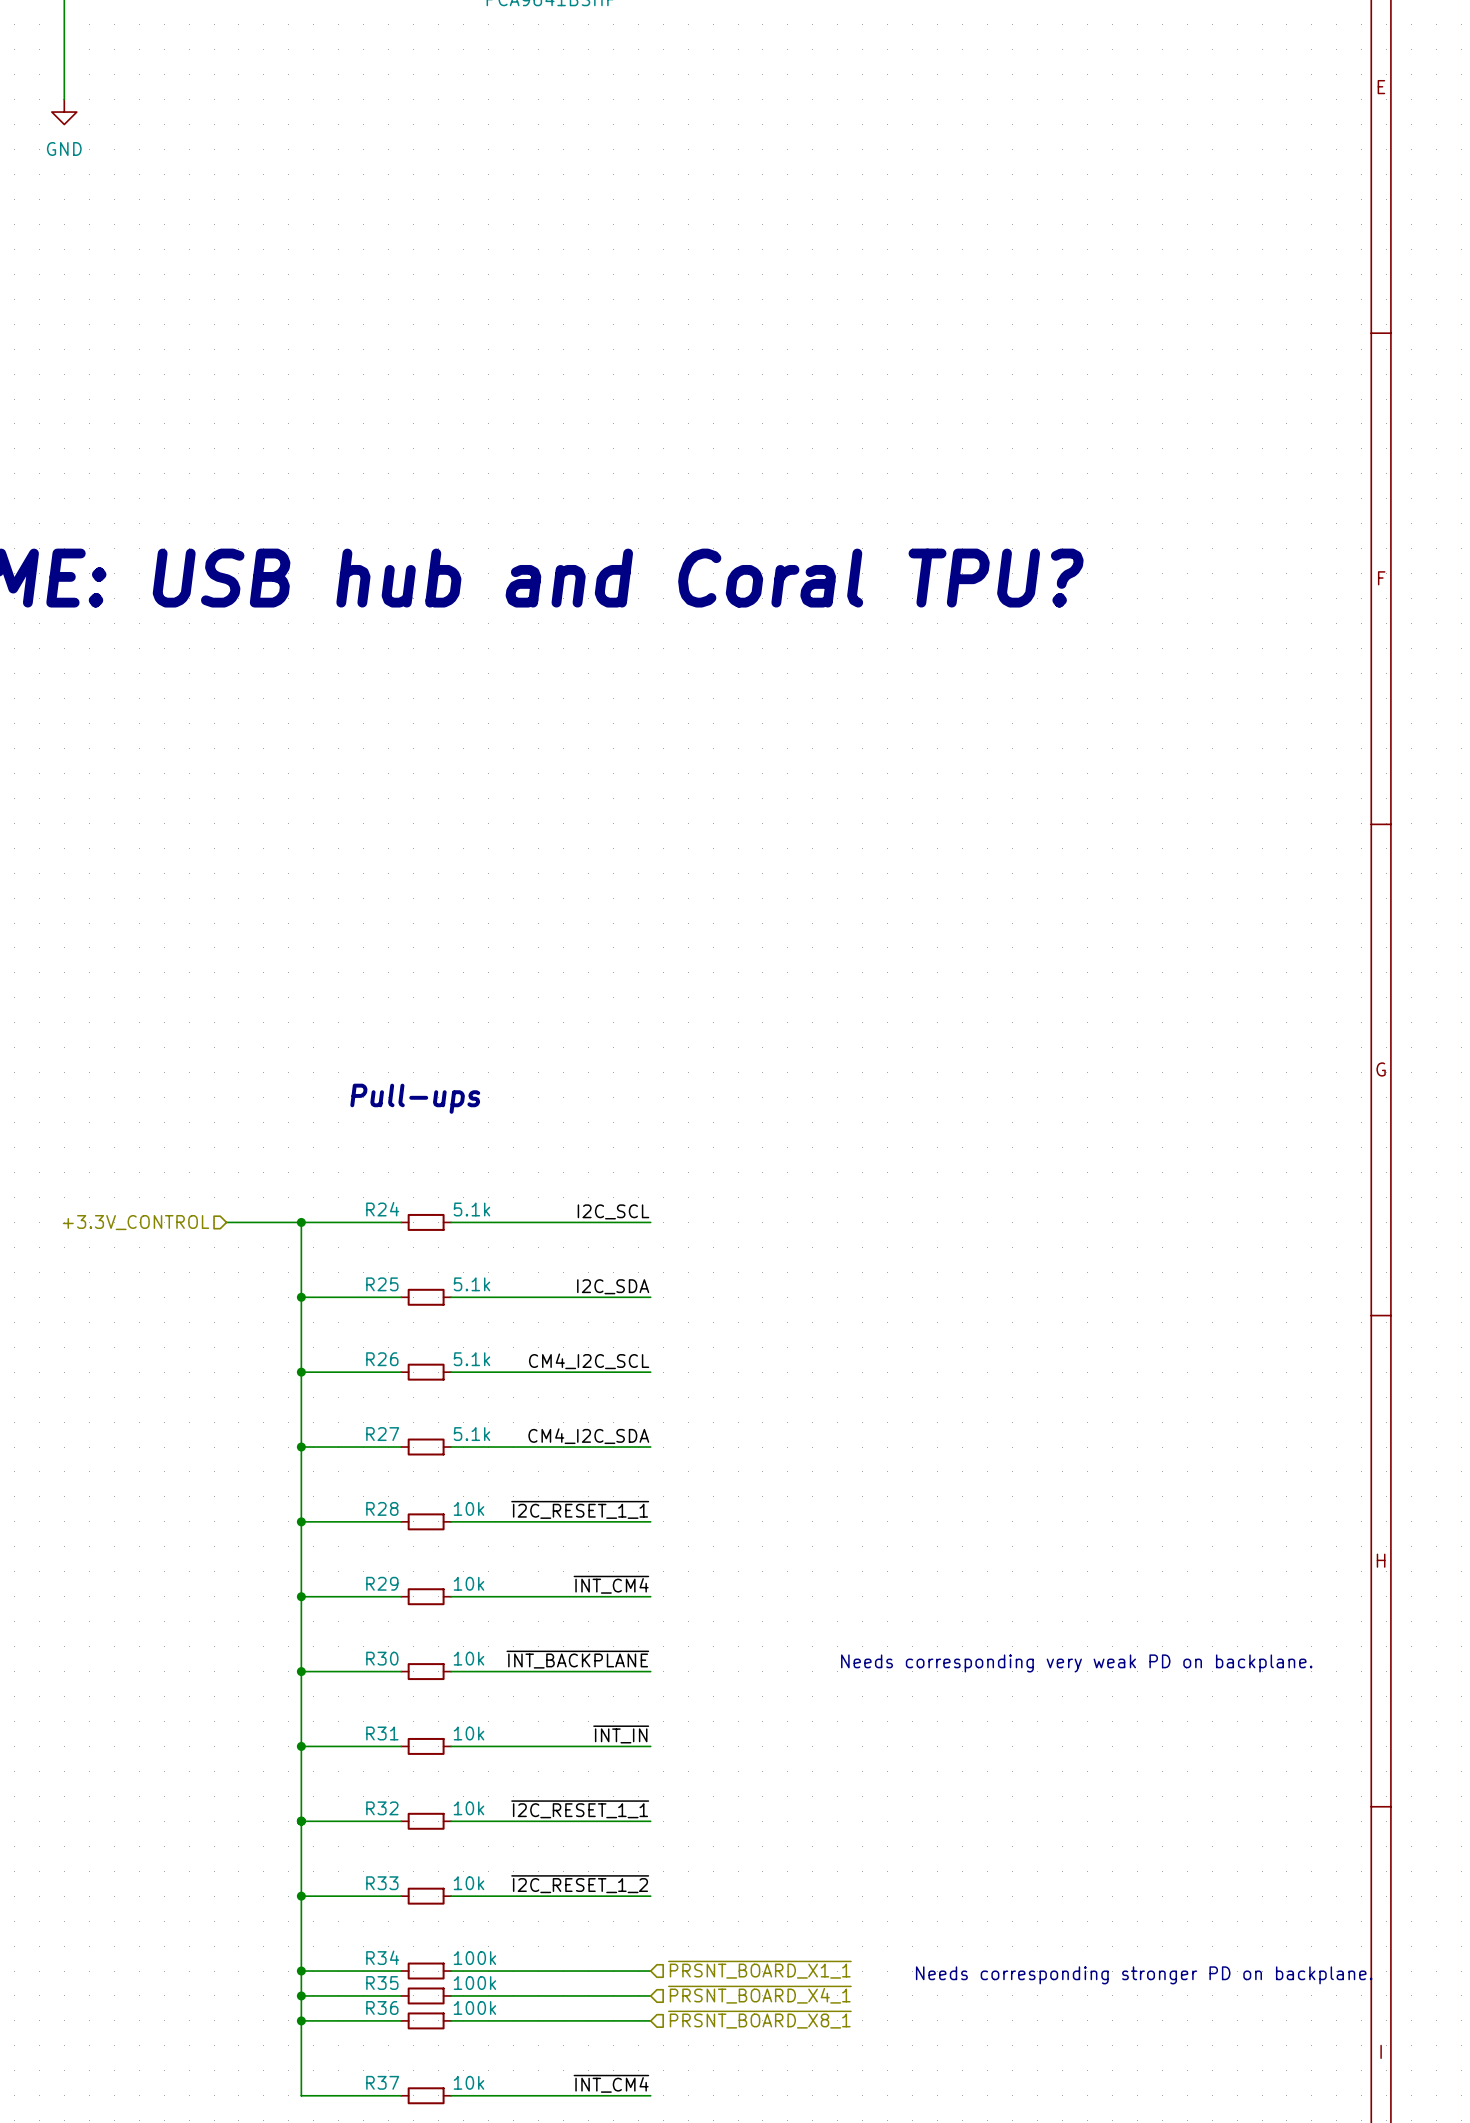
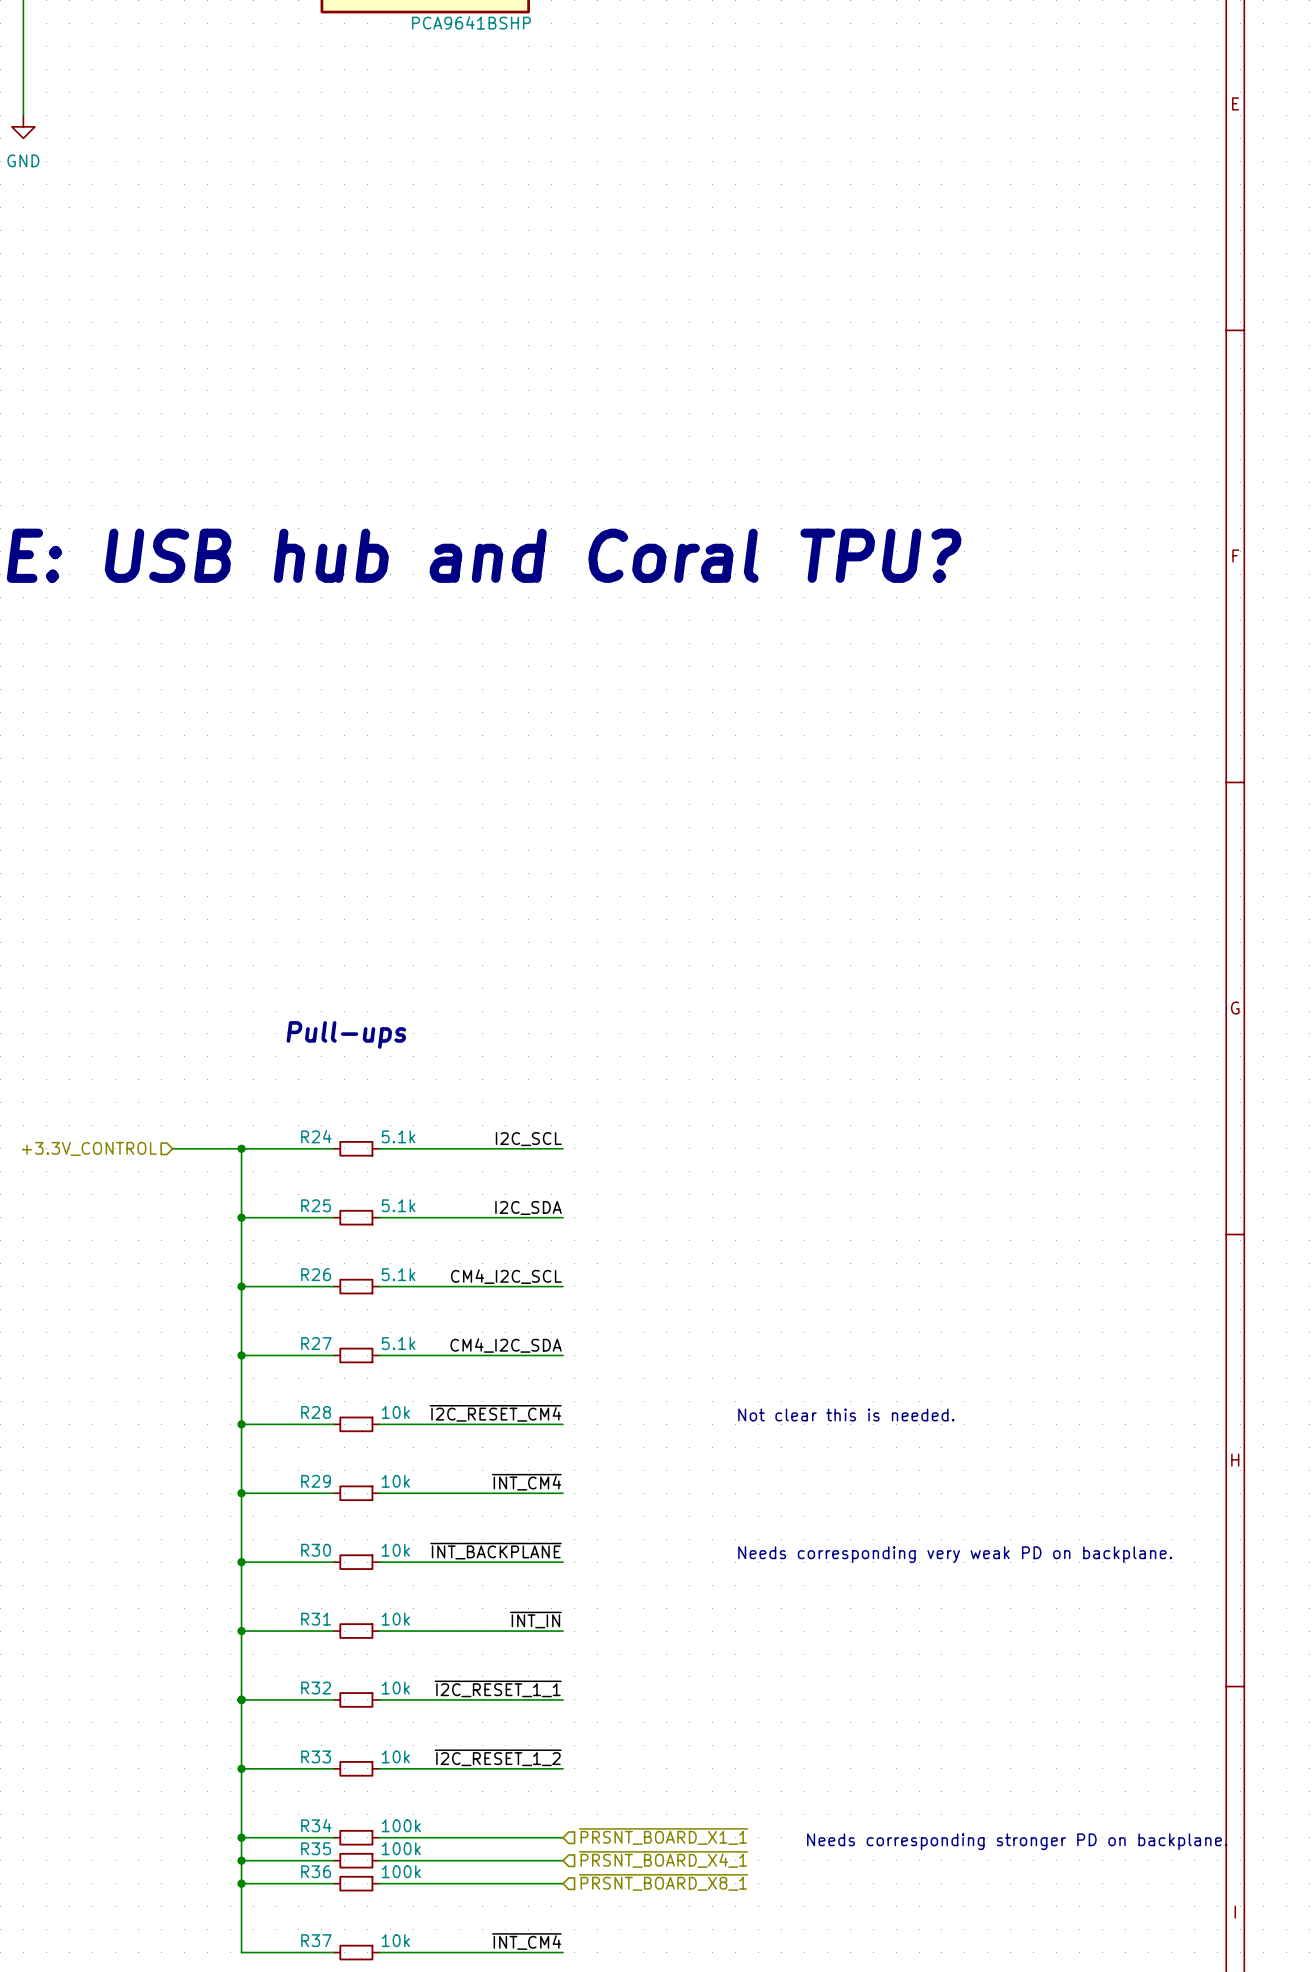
label: ~{I2C_RESET_1_1} (580, 1509) -> ~{I2C_RESET_CM4} (495, 1413)
text: none -> Not clear this is needed. (846, 1414)

